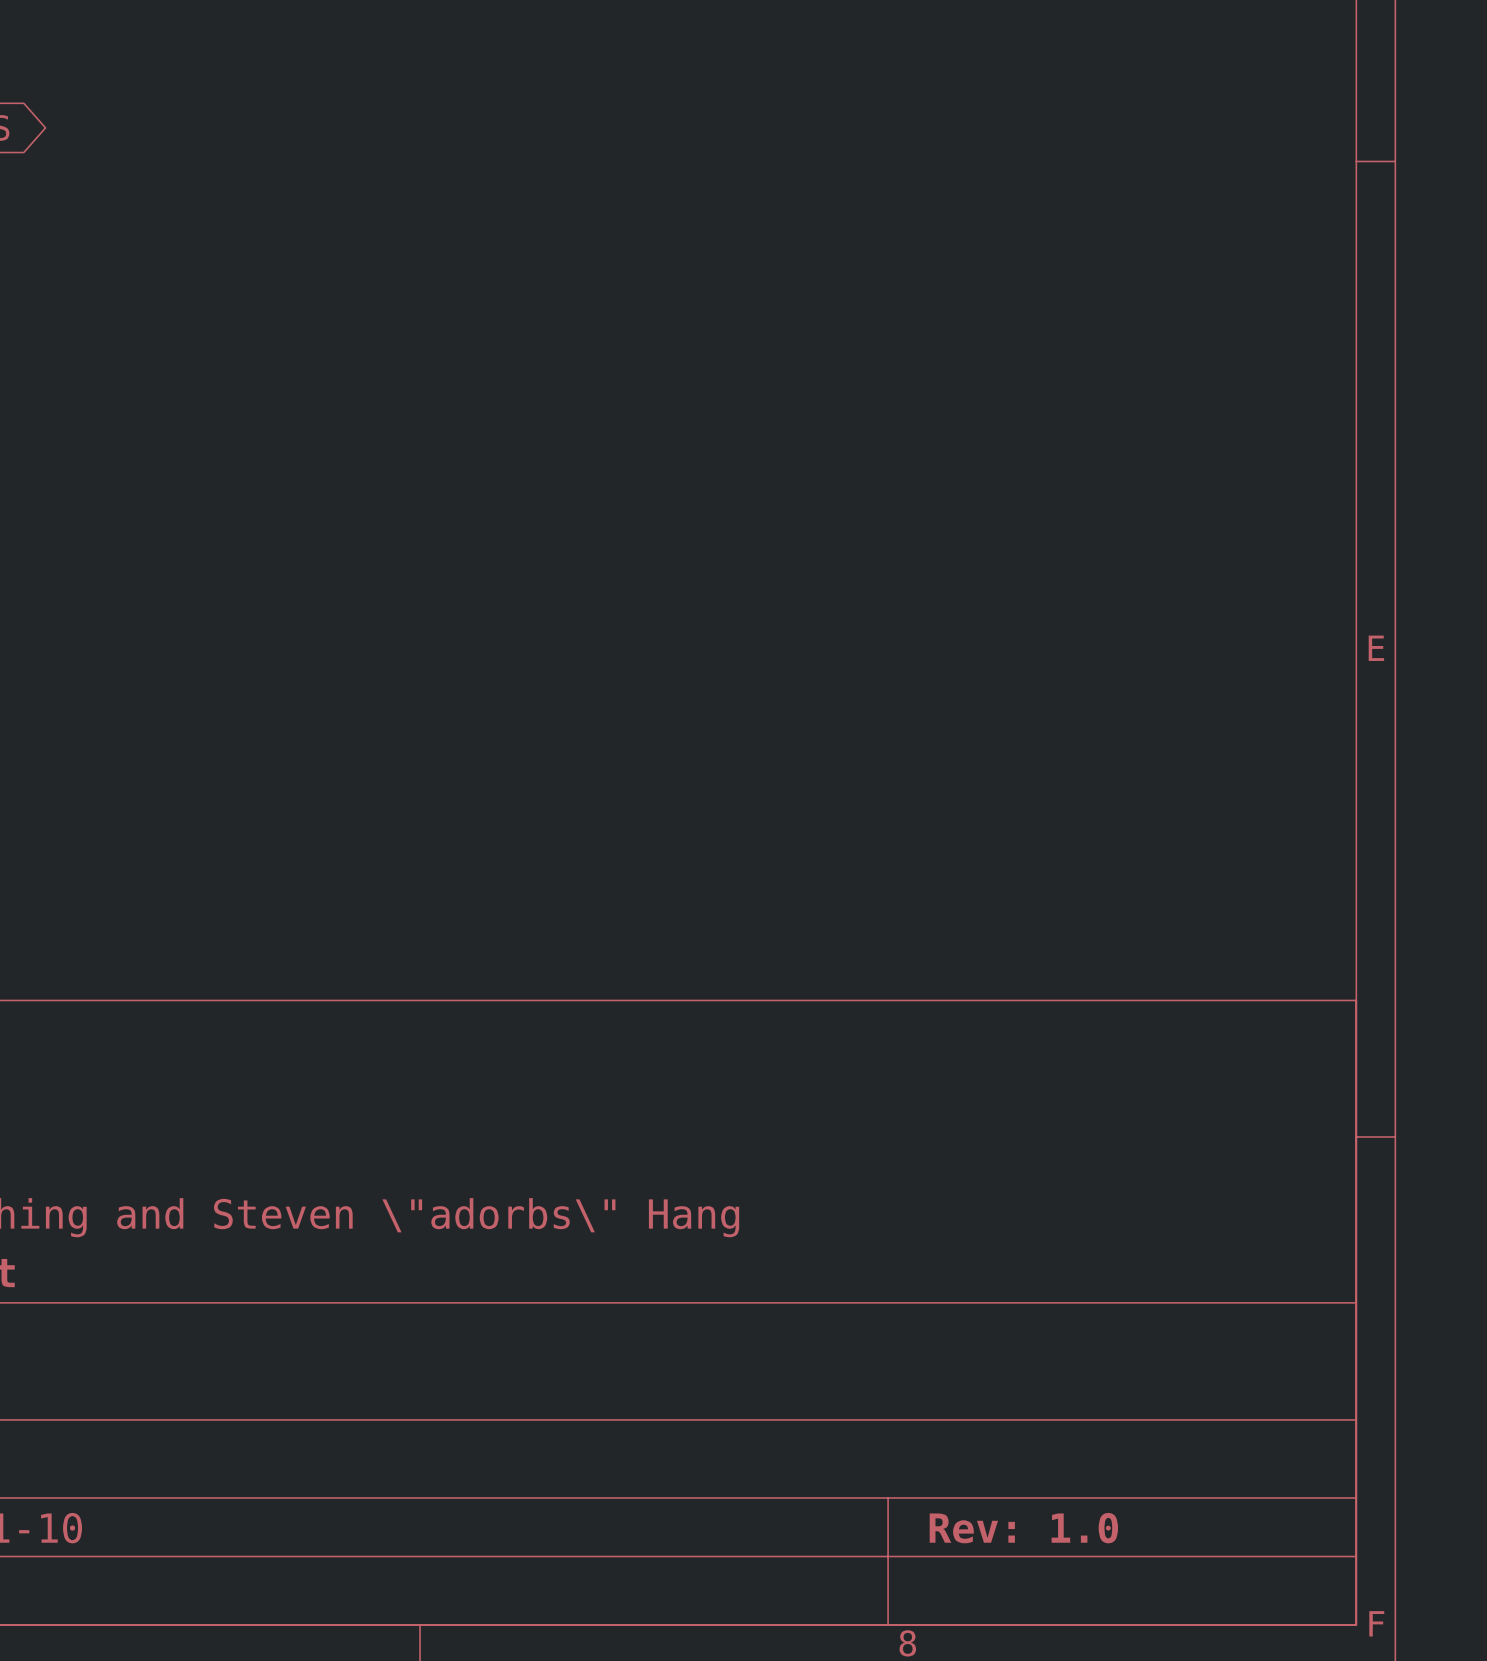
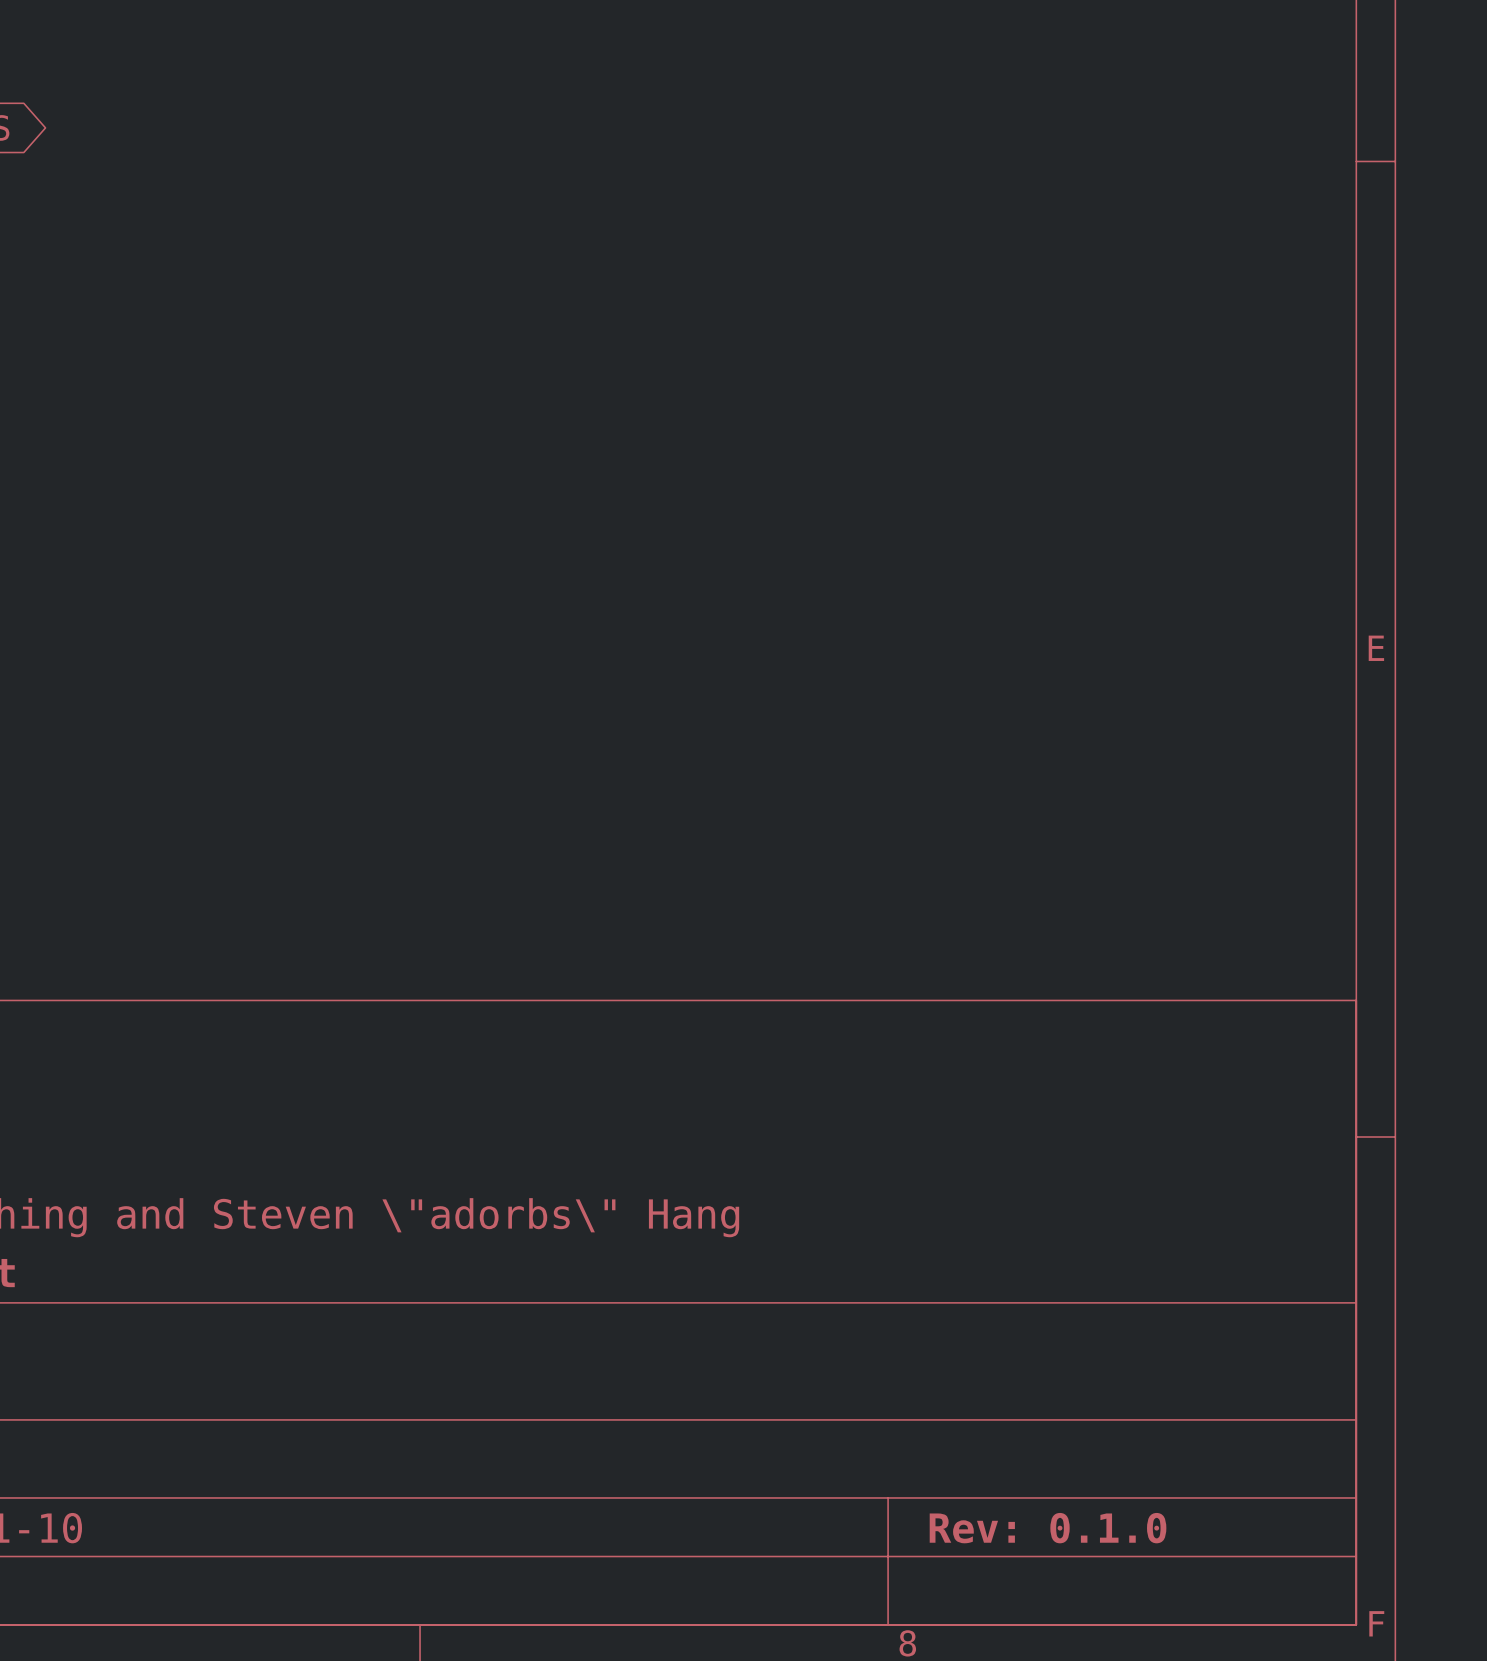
title block: Rev: 1.0 (1023, 1528) -> Rev: 0.1.0 (1048, 1528)

